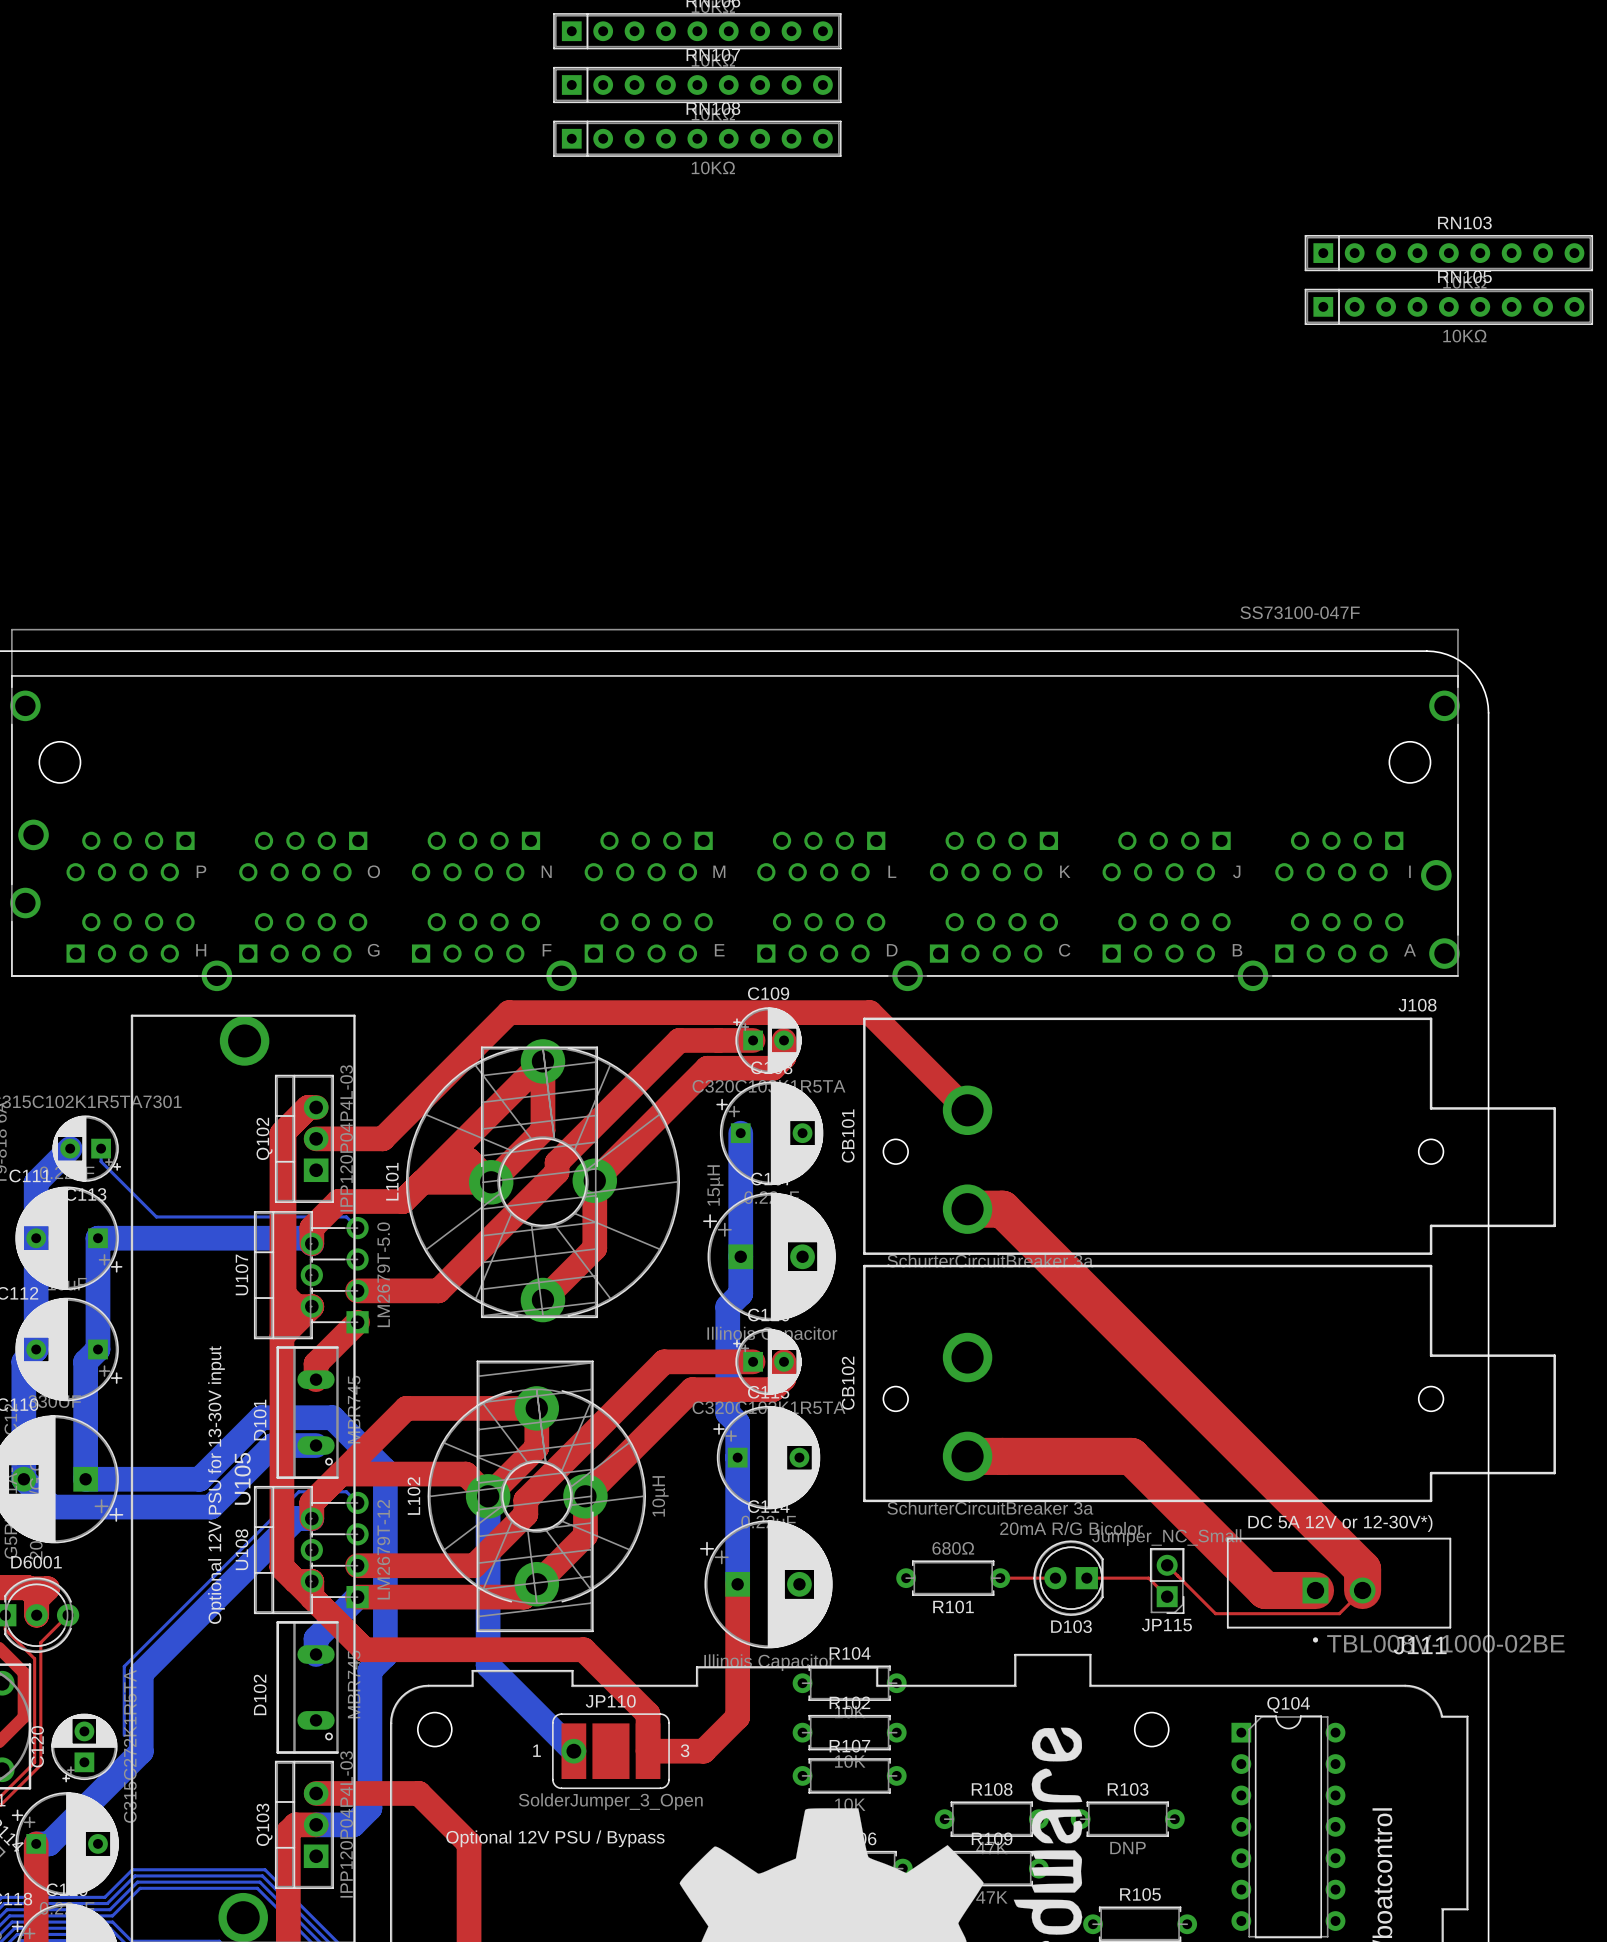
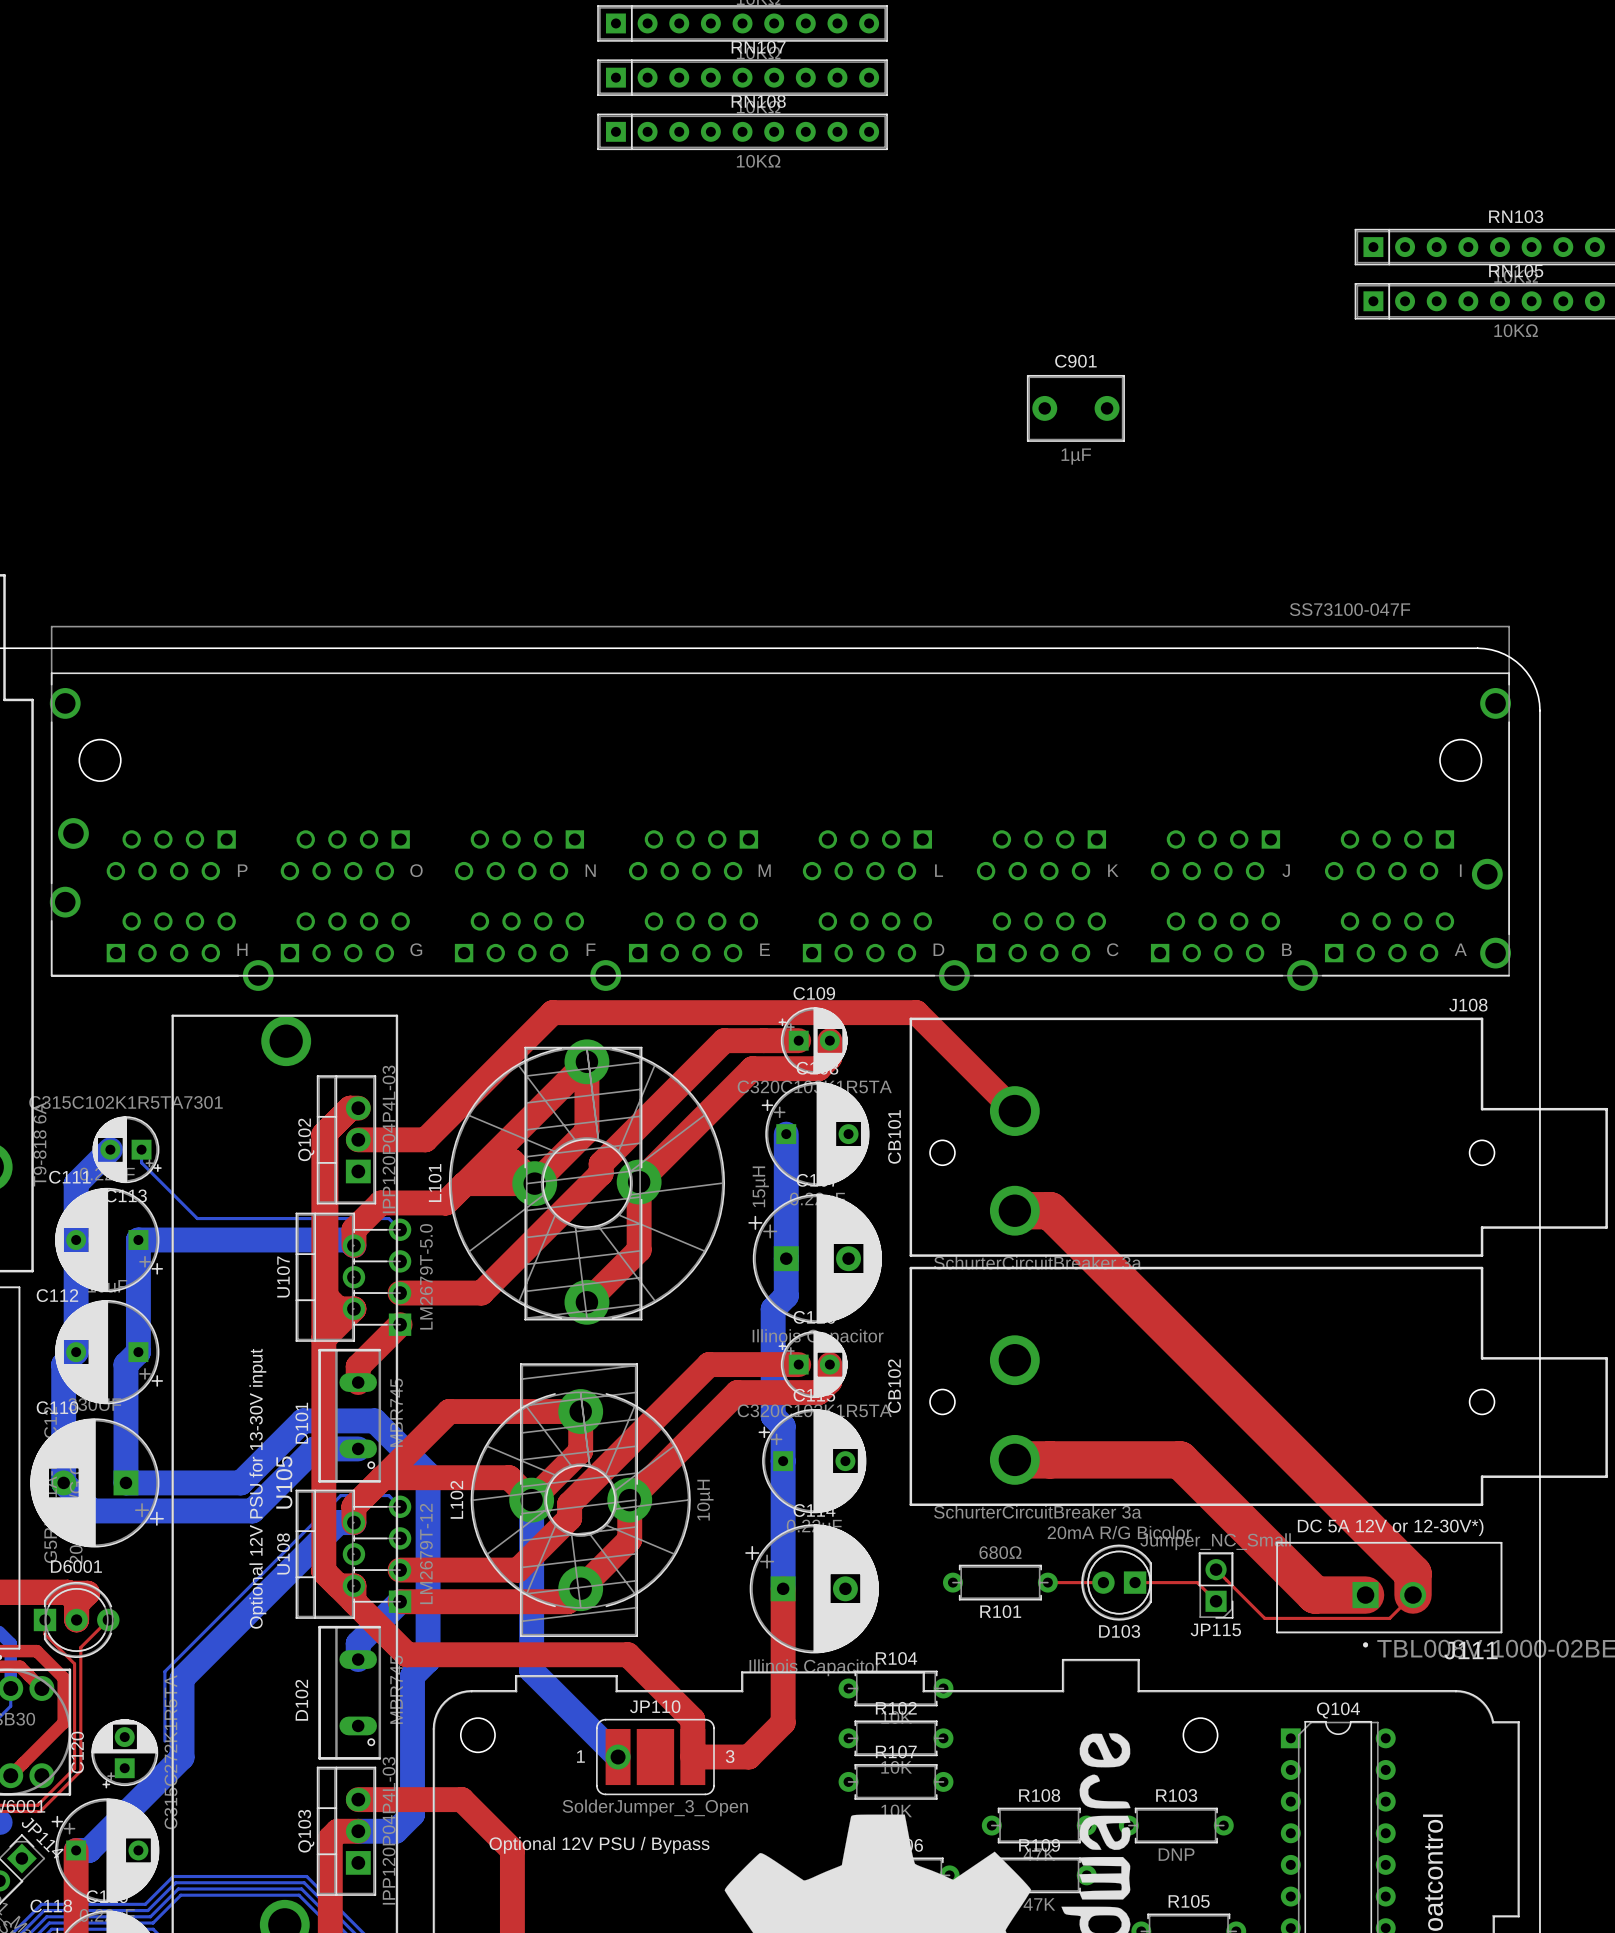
C901: none -> 1µF (1075, 408)

